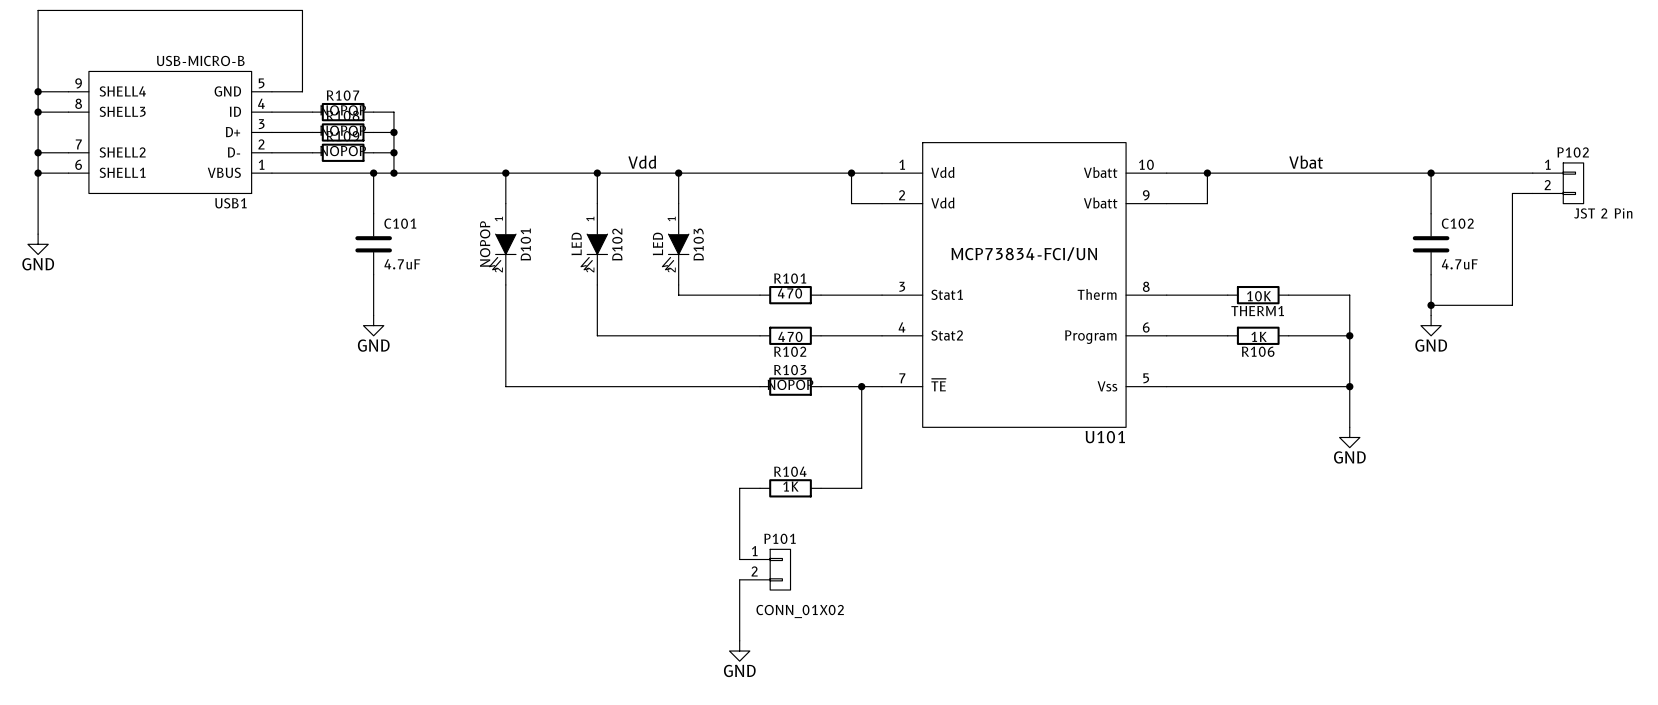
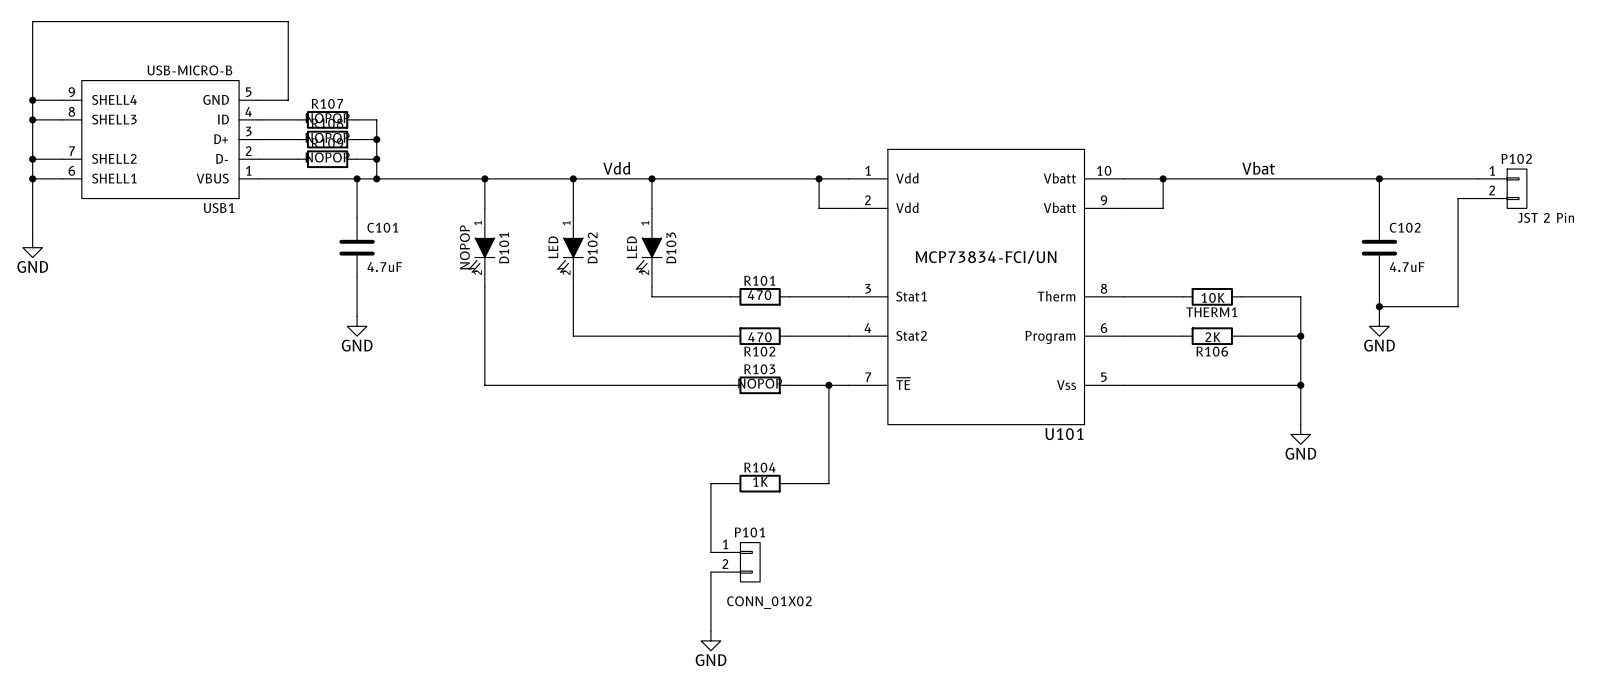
R106 value: 1K (1259, 336) -> 2K (1212, 337)

